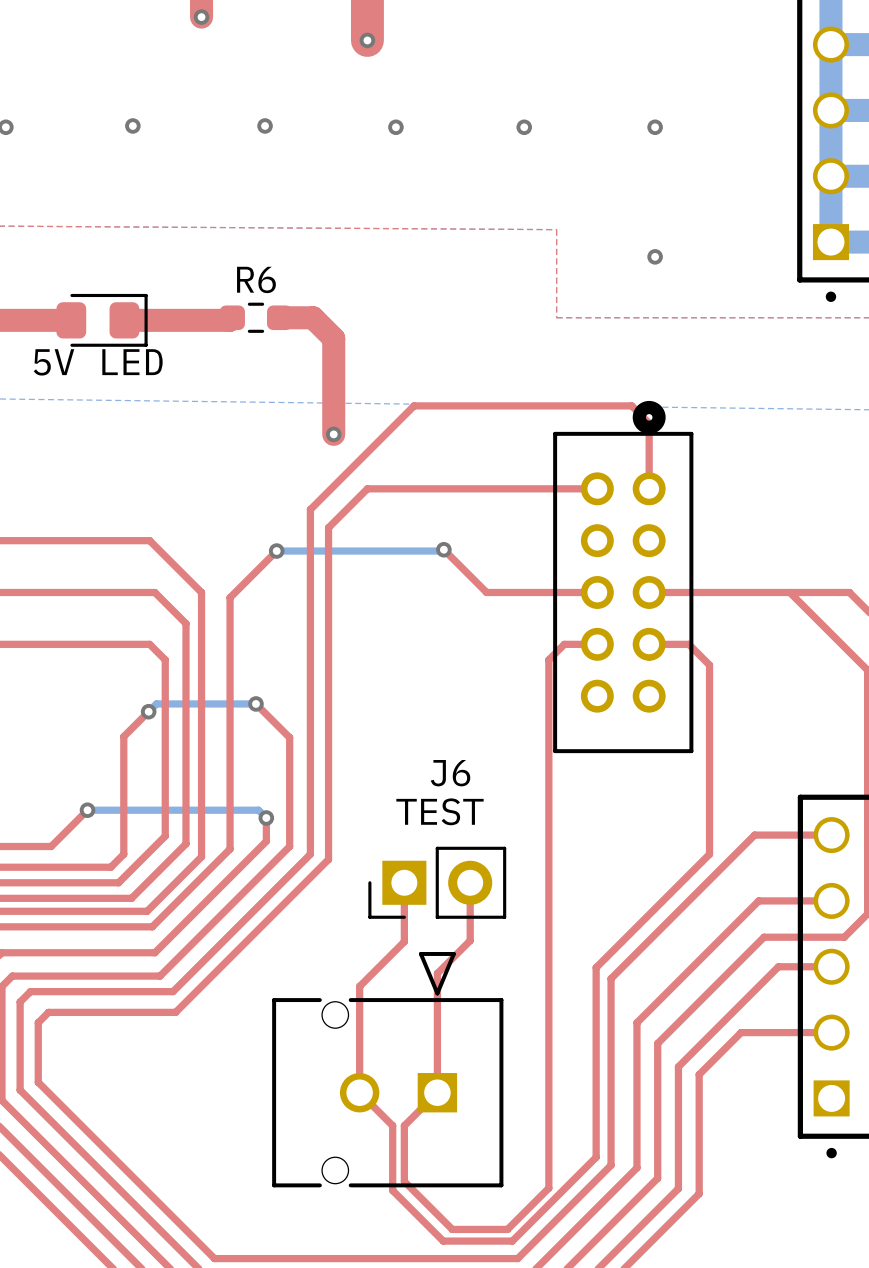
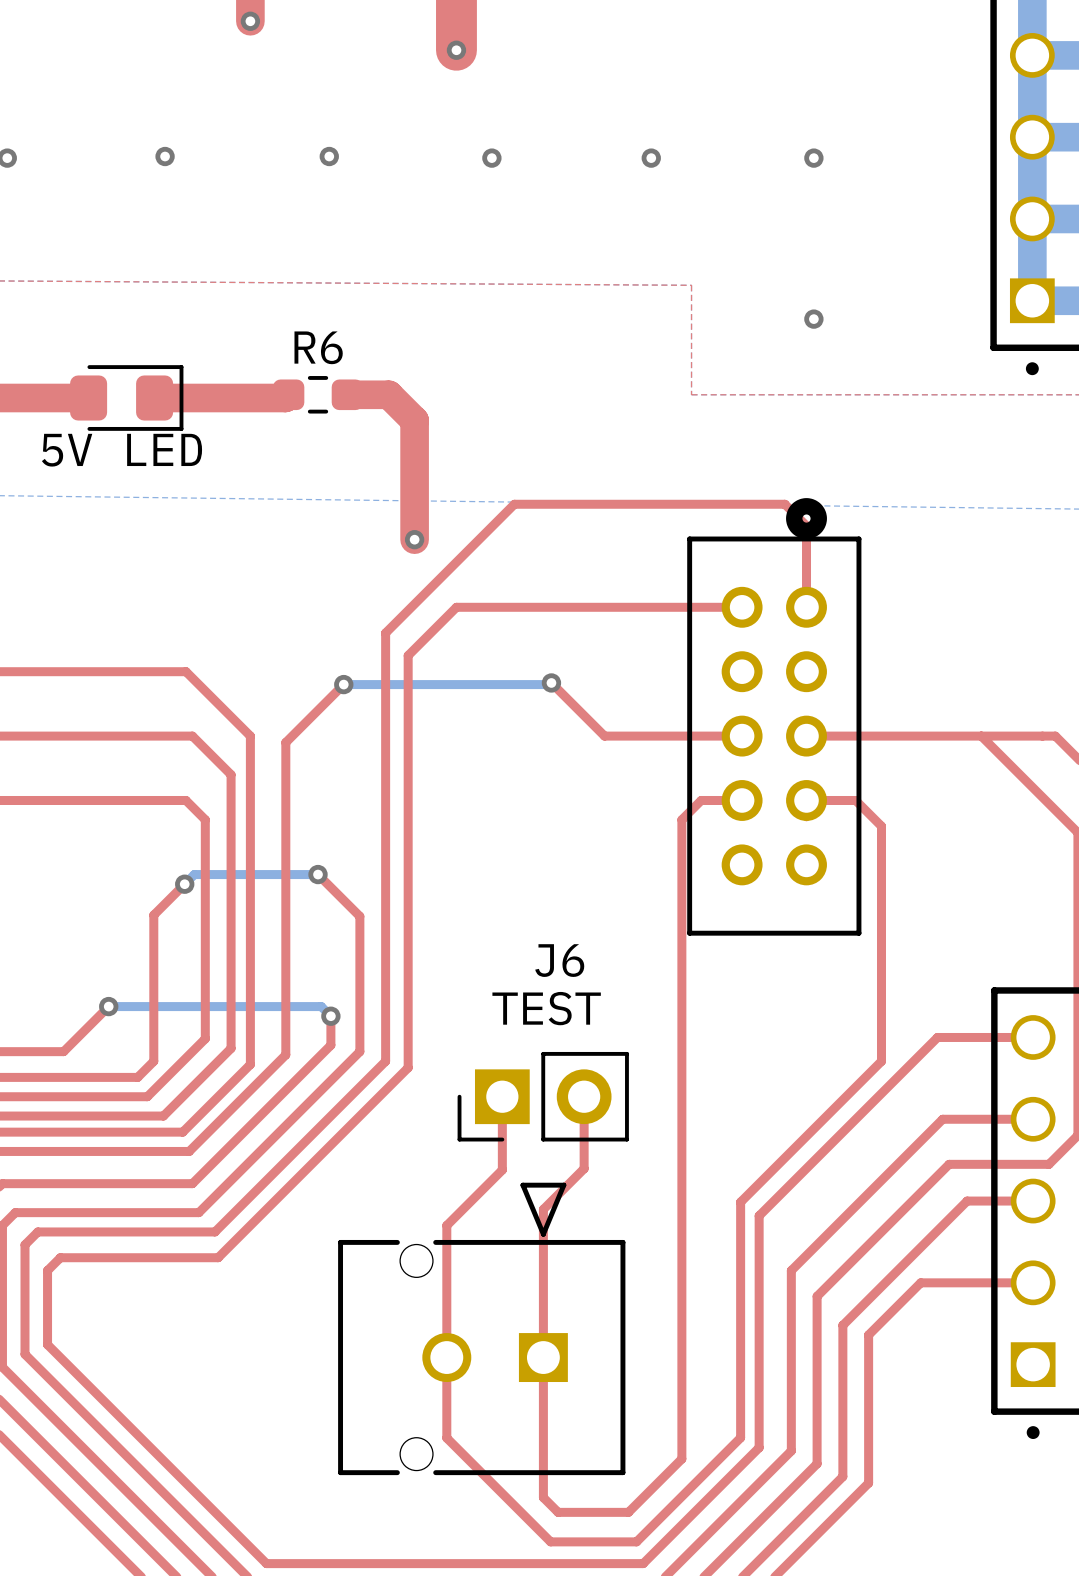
top track: (359, 1092) (392, 1125) (392, 1190) -> (446, 1357) (446, 1438) (487, 1479)
top track: (437, 1092) (404, 1125) (404, 1181) (452, 1229) (507, 1229) (548, 1188) (548, 1174) -> (543, 1357) (543, 1497) (558, 1512) (628, 1512) (681, 1458)

